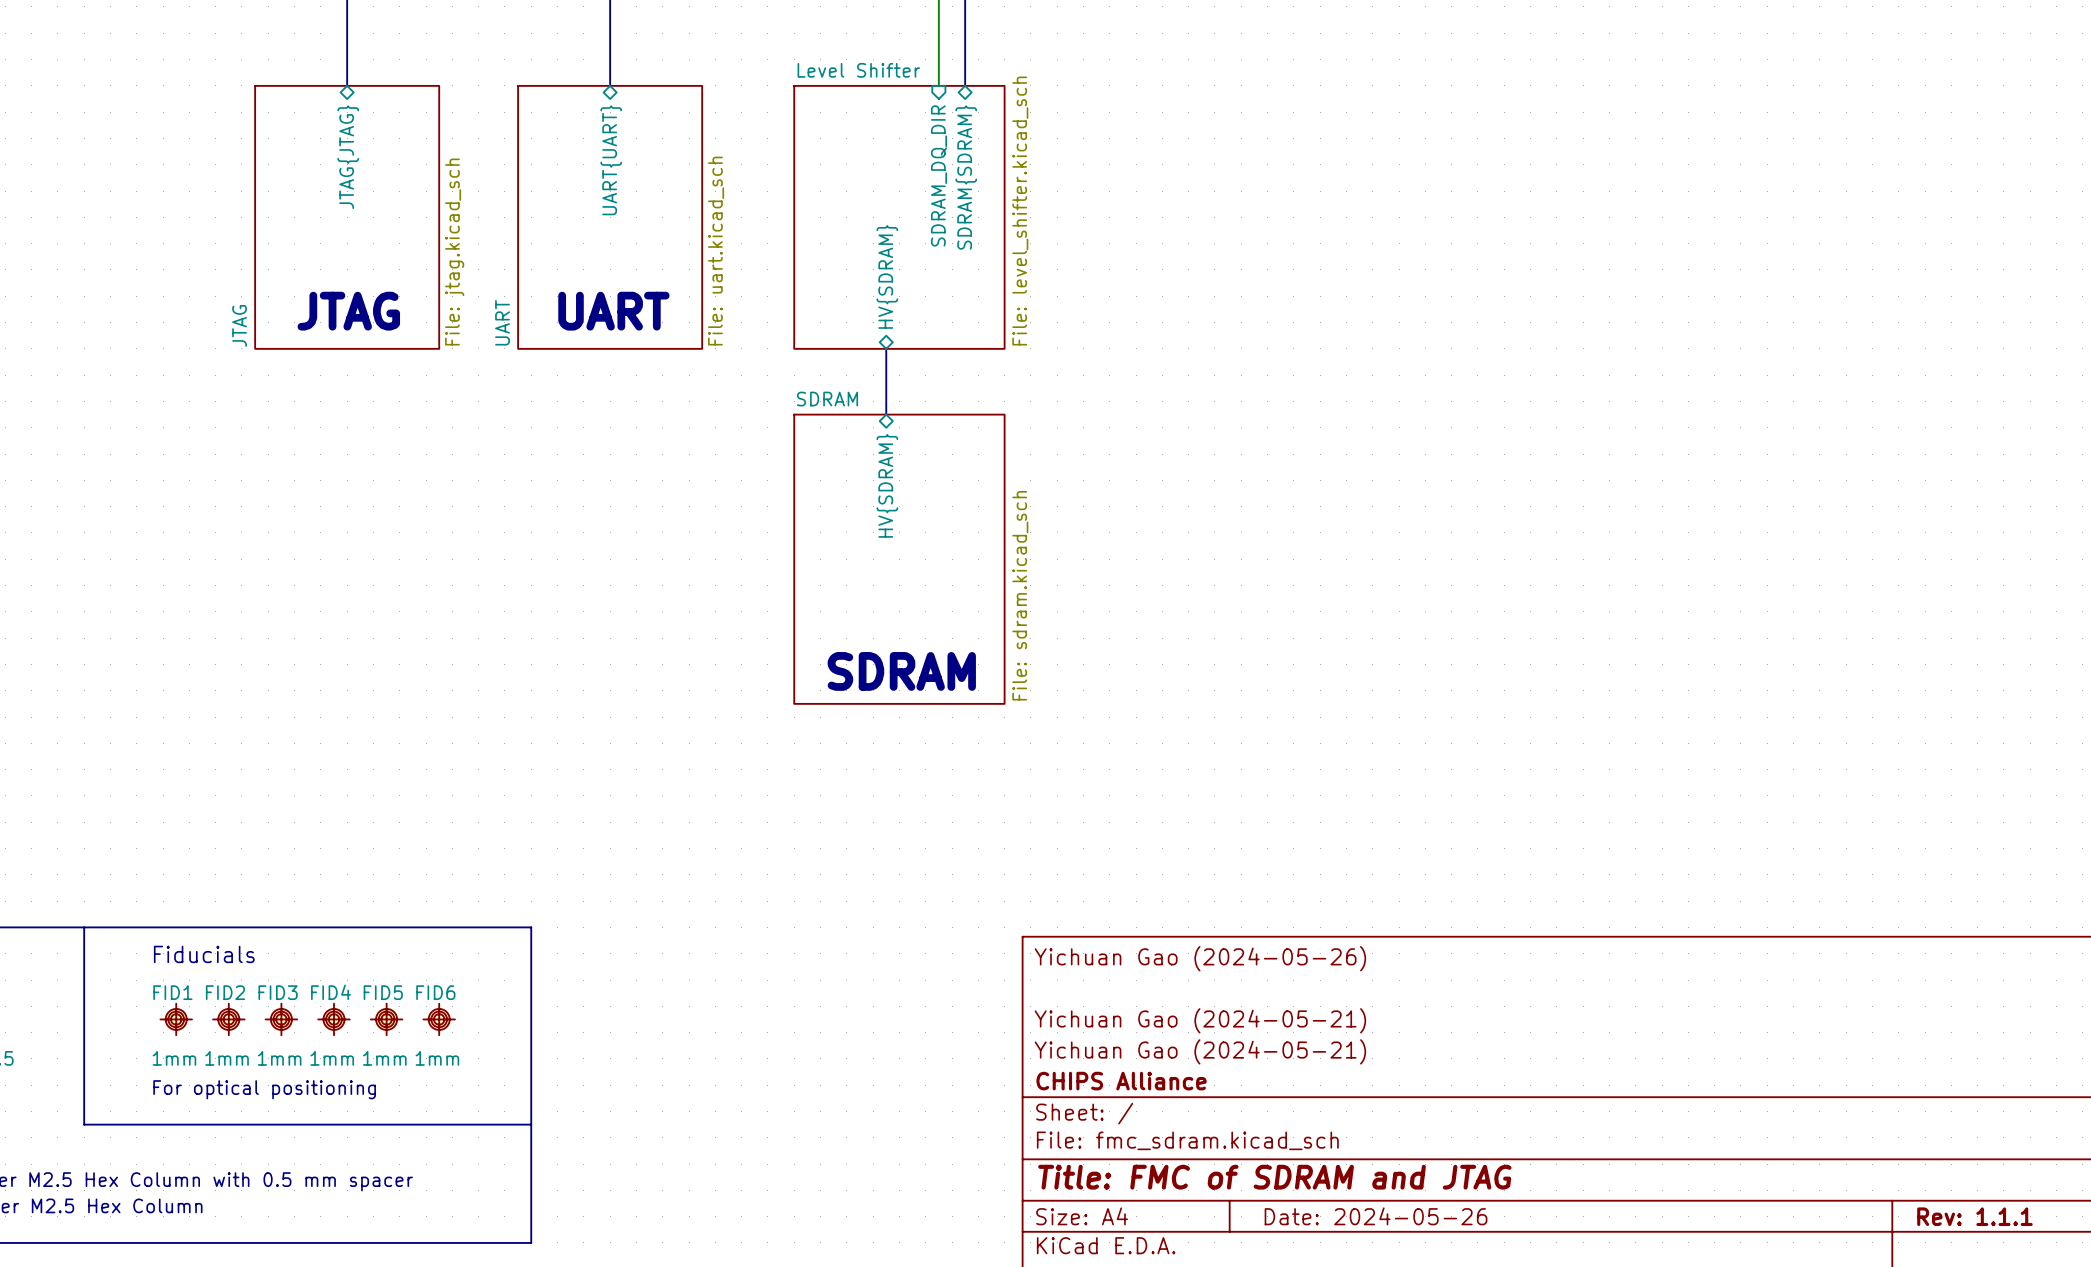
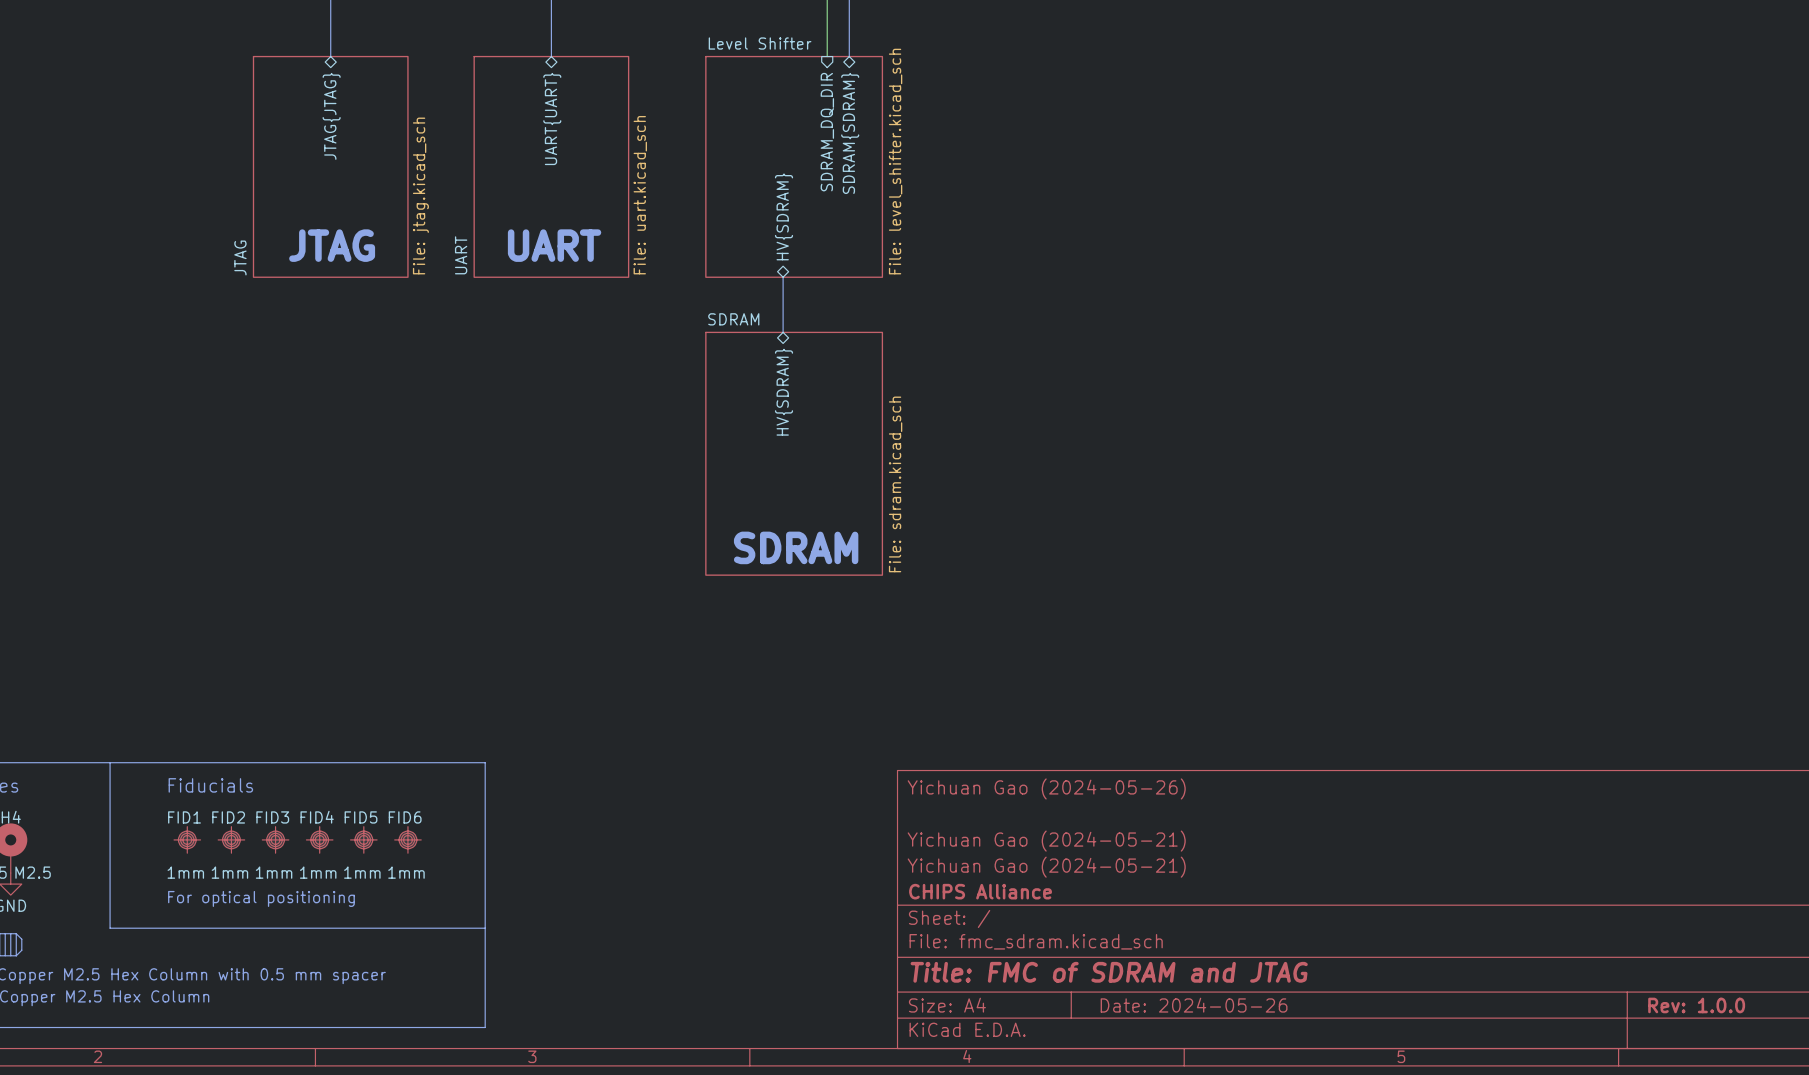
title block: Rev: 1.1.1 (1974, 1216) -> Rev: 1.0.0 (1696, 1005)

